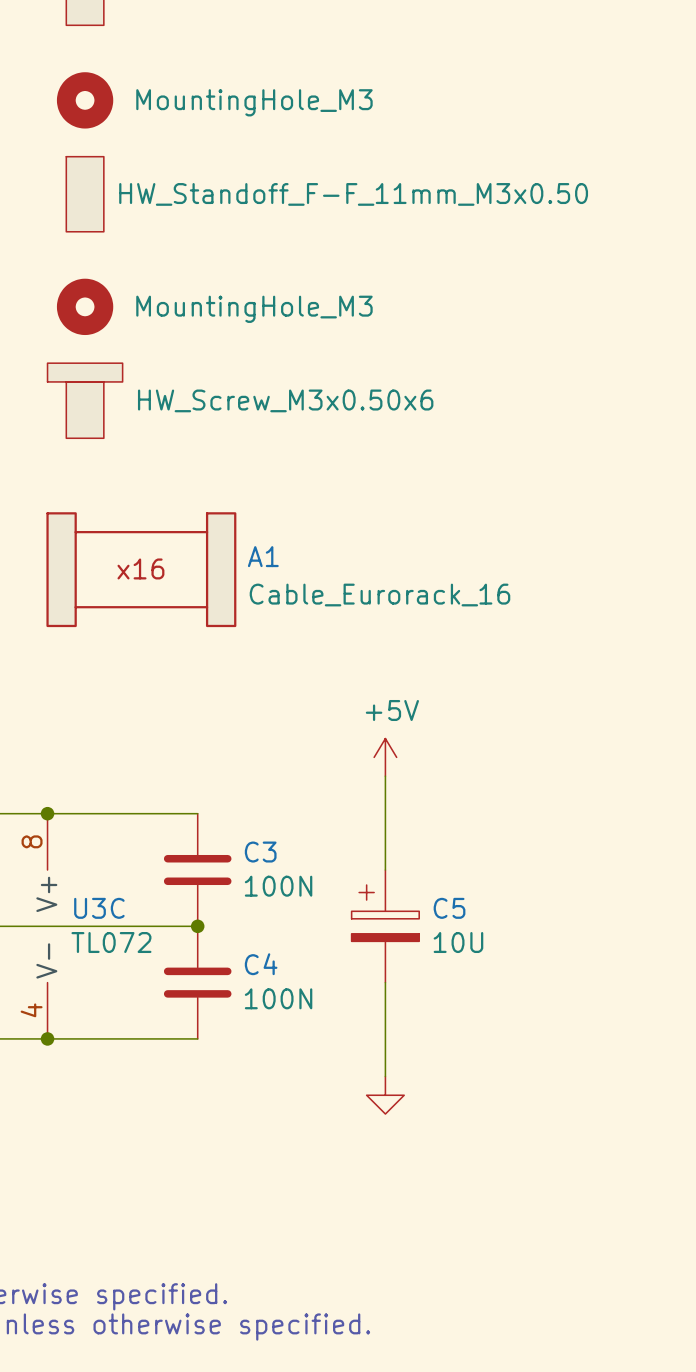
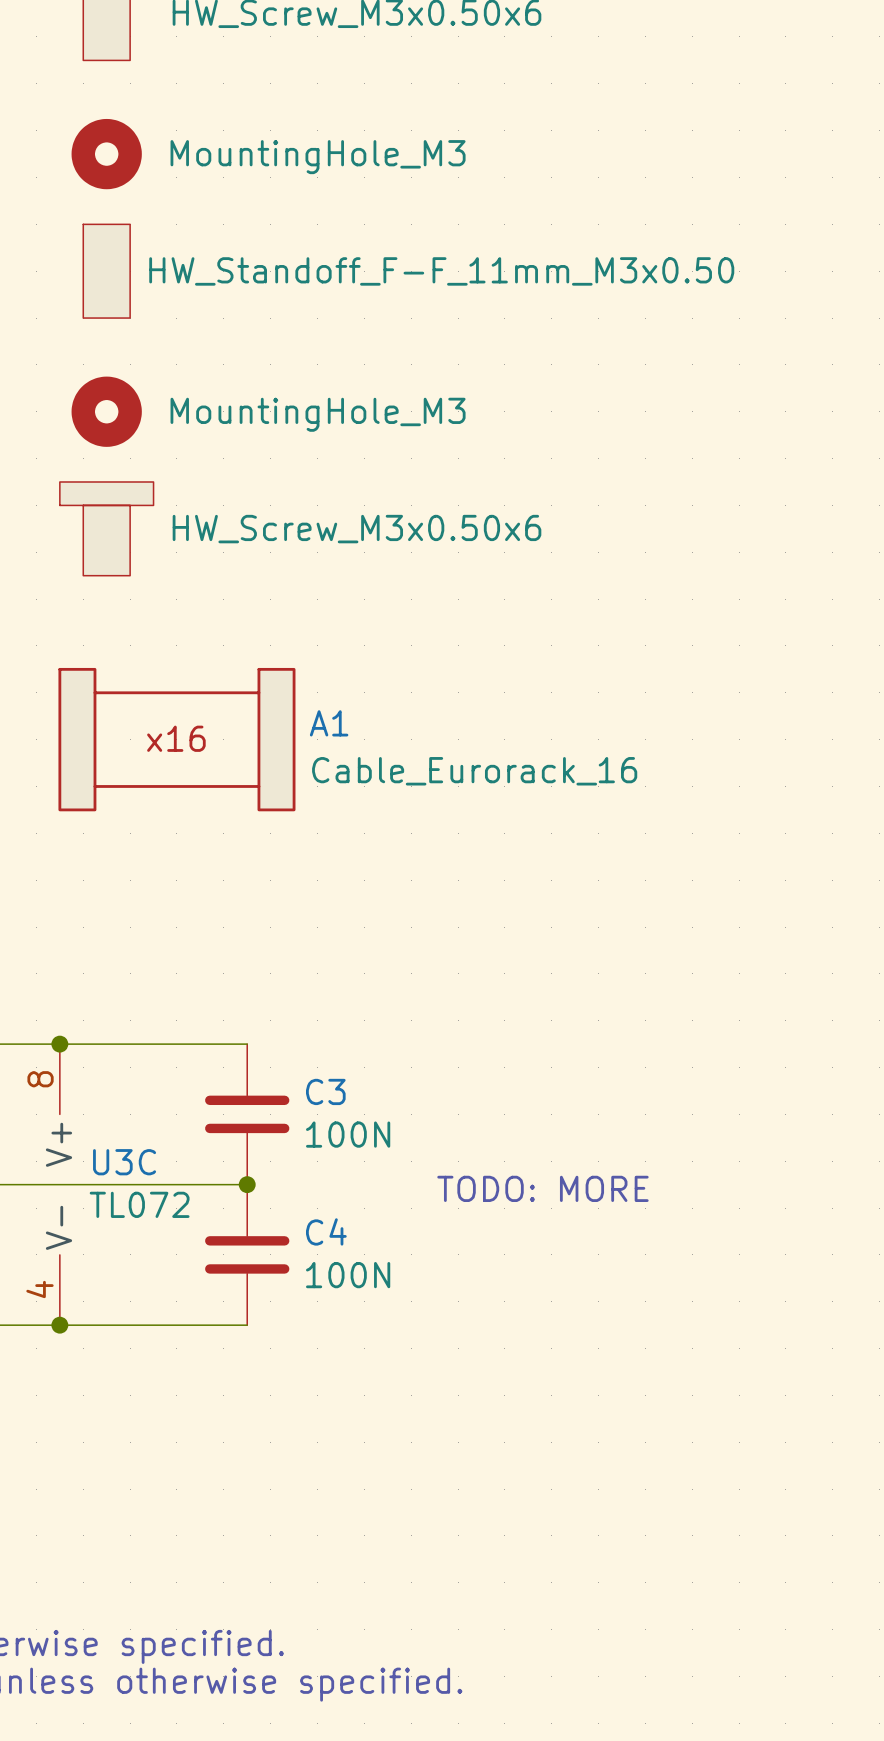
power symbol: +5V (385, 757) -> none
wire: (385, 776) (385, 870) -> none
C5: 10U (385, 926) -> none
text: none -> TODO: MORE (542, 1188)
wire: (385, 982) (385, 1076) -> none
power symbol: (385, 1095) -> none

